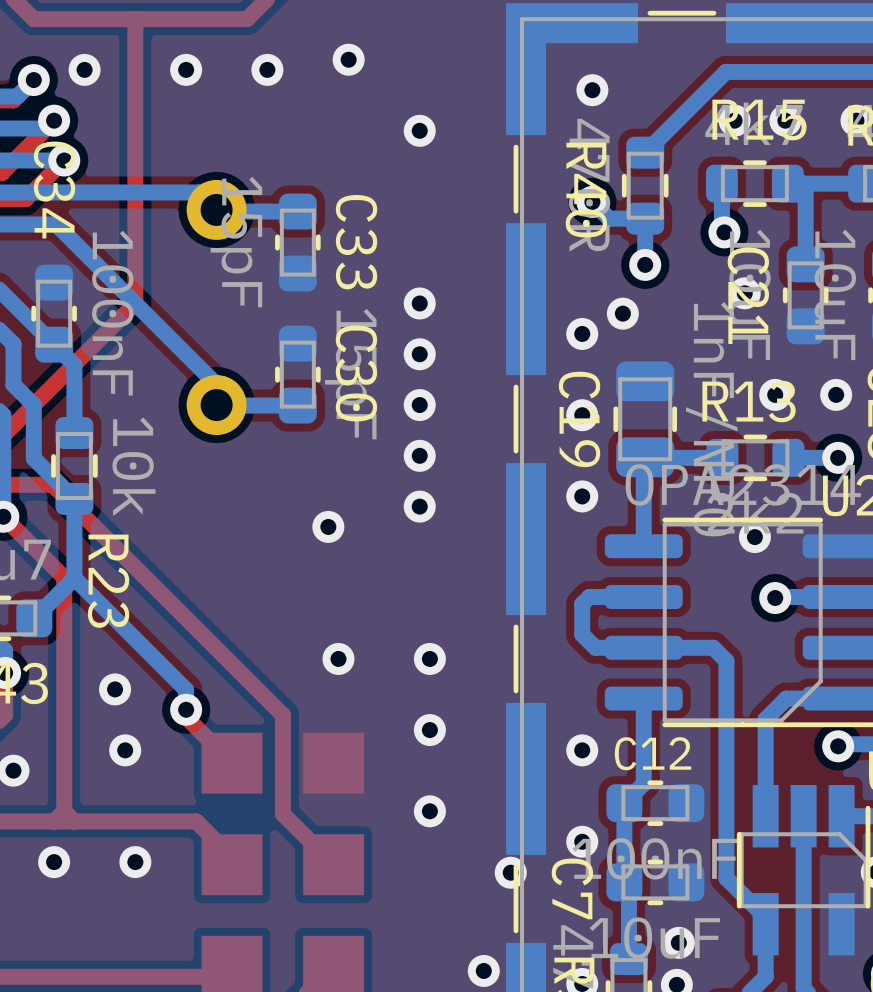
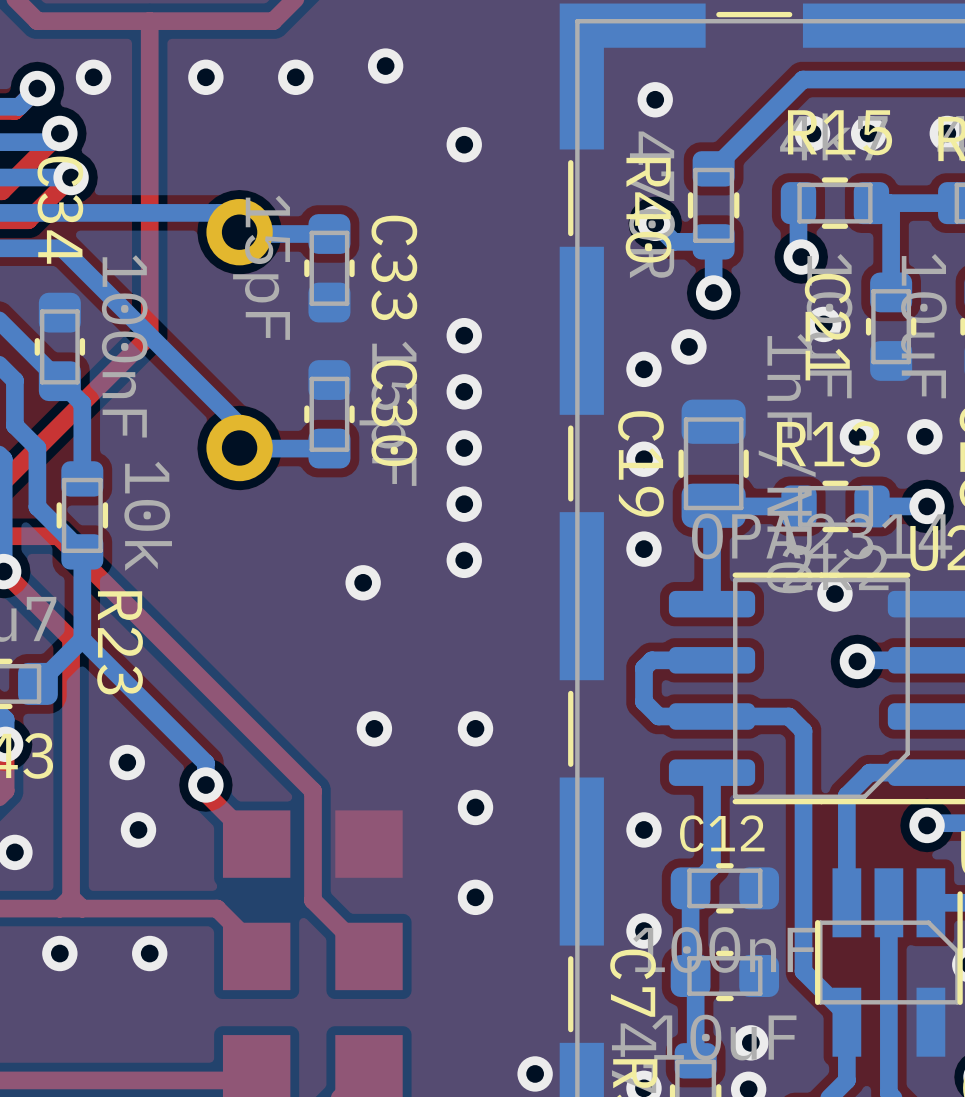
via: (510, 872) -> none

